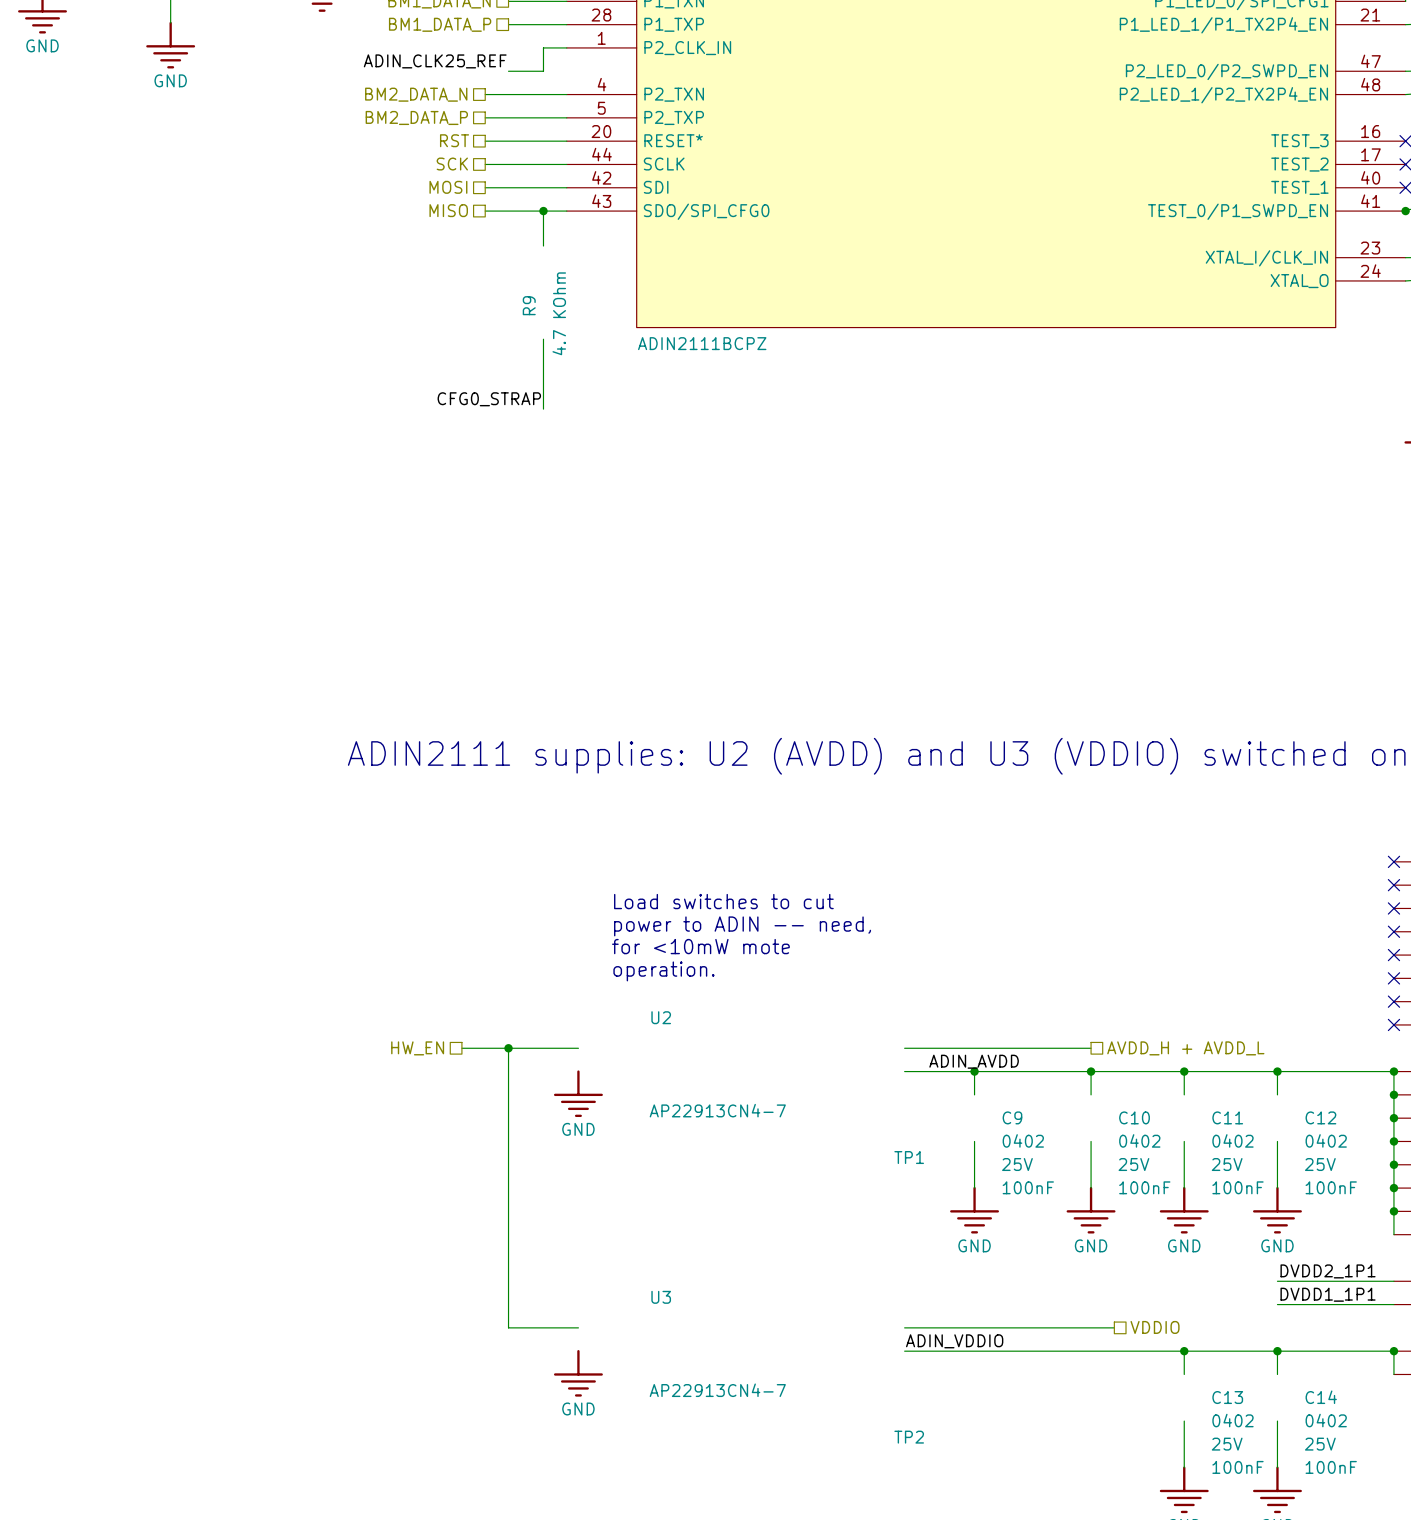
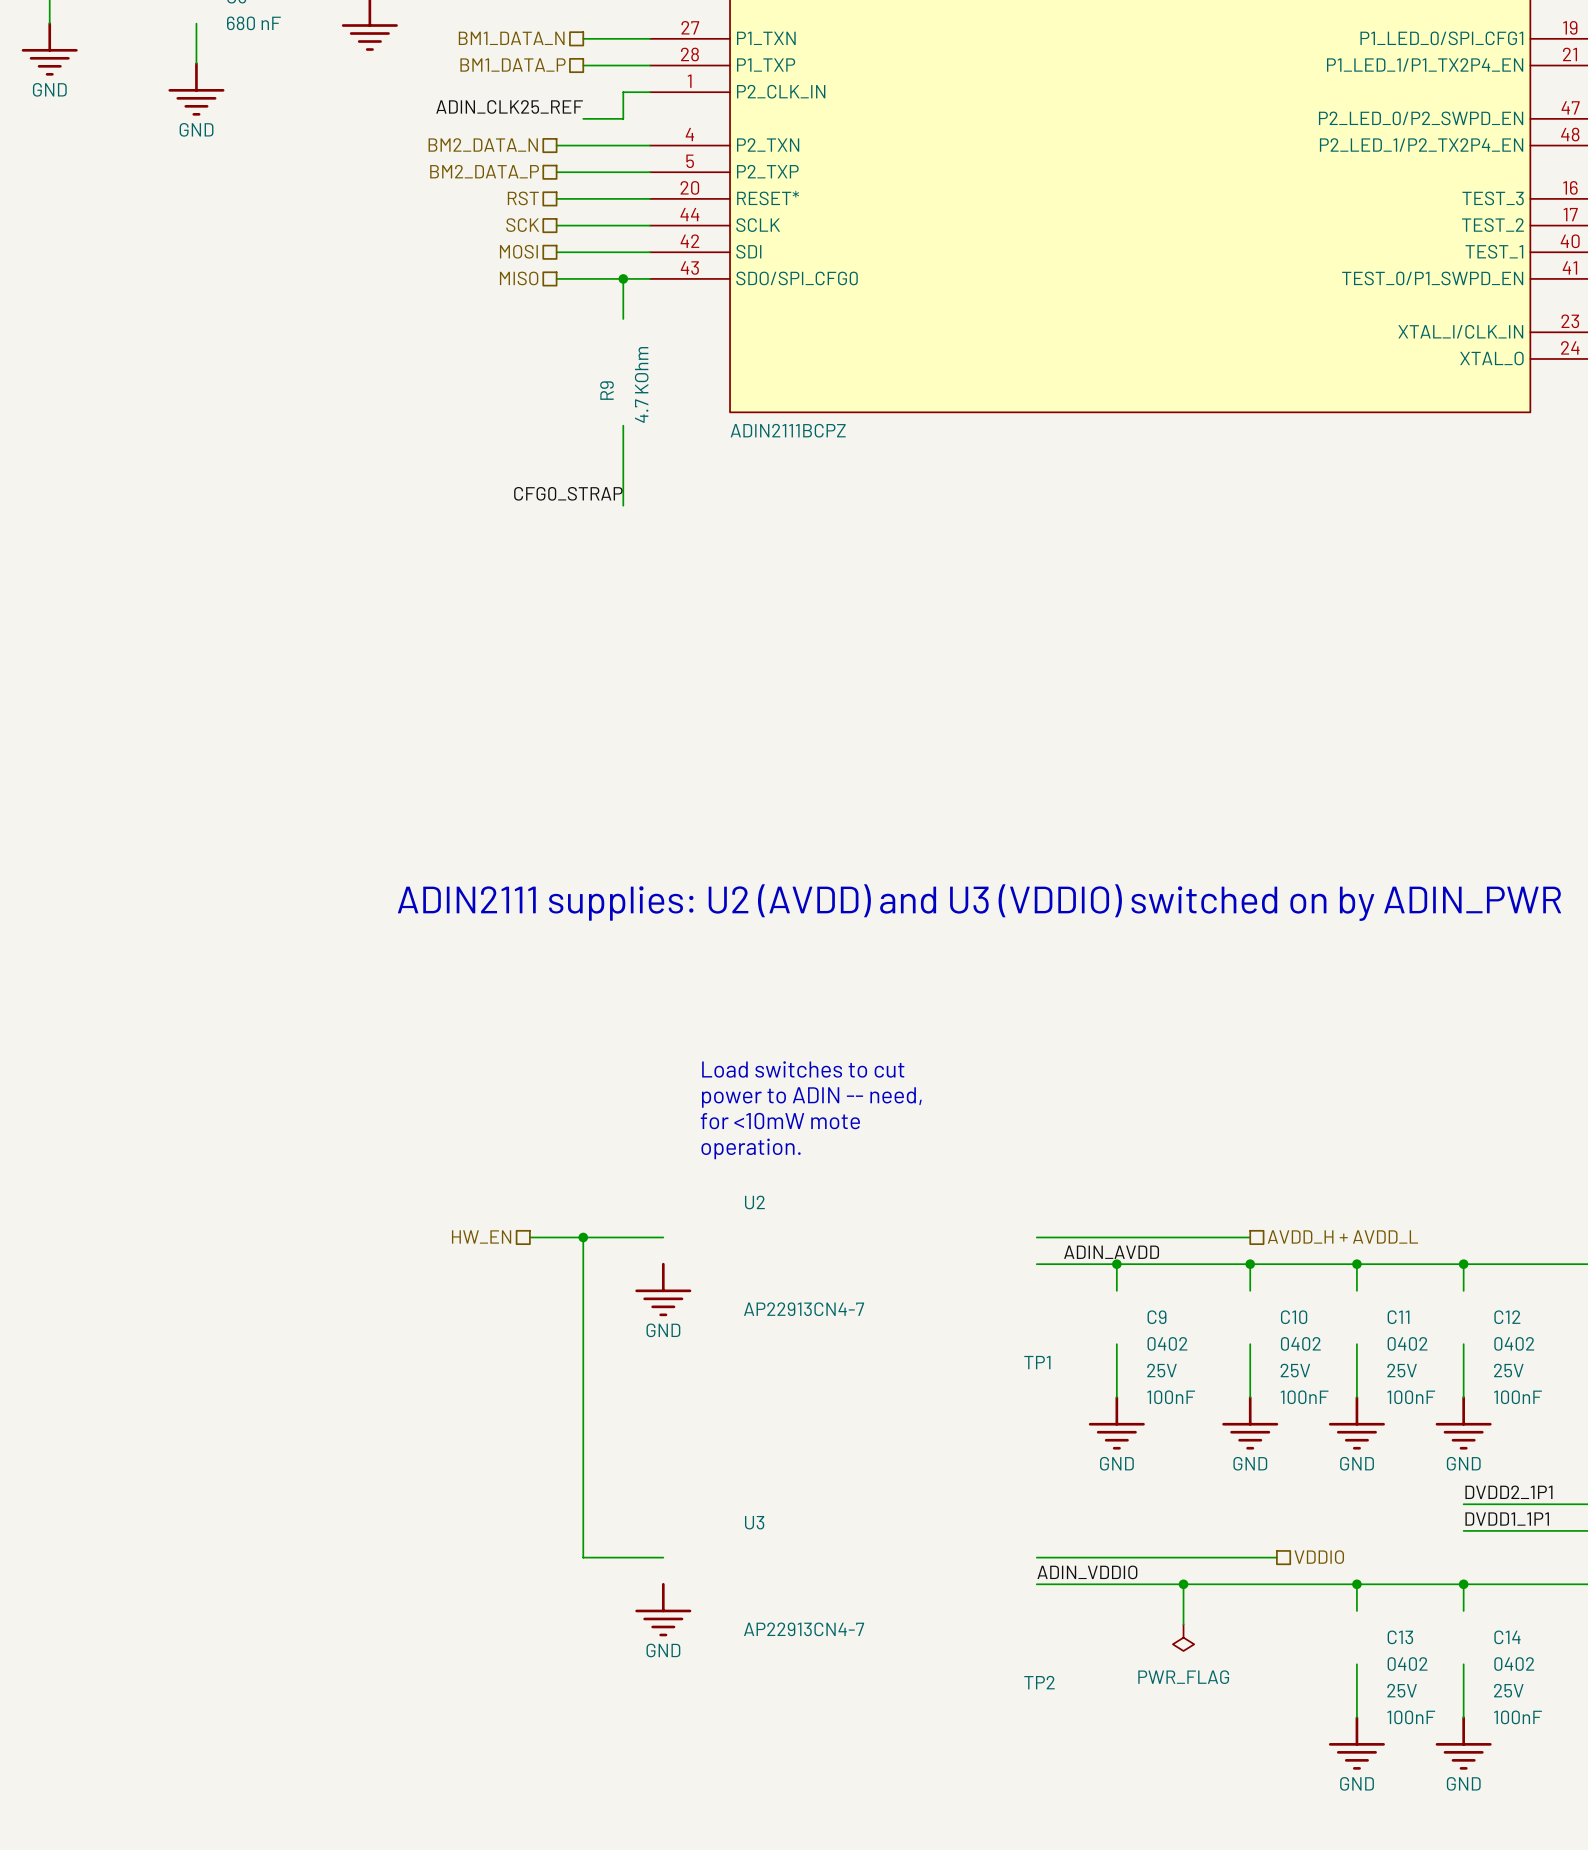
wire: none -> (1183, 1584) (1183, 1624)
junction: none -> (1183, 1584)
power symbol: none -> PWR_FLAG (1183, 1637)

